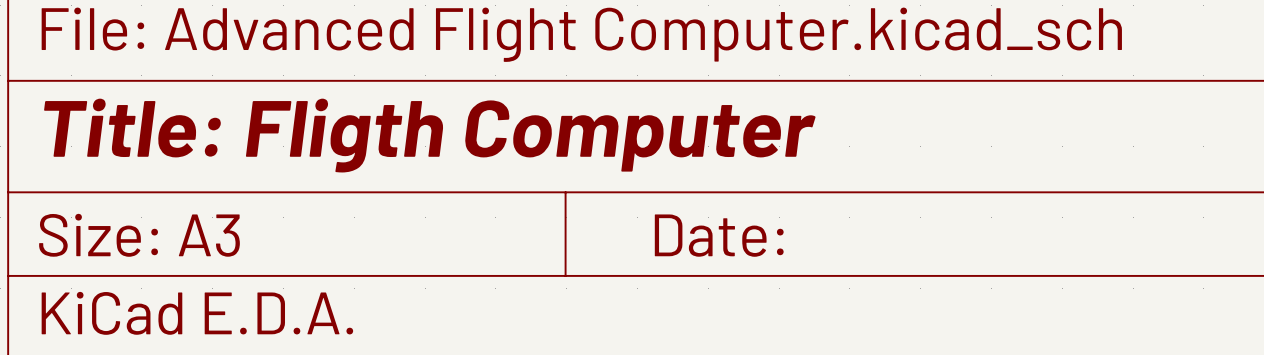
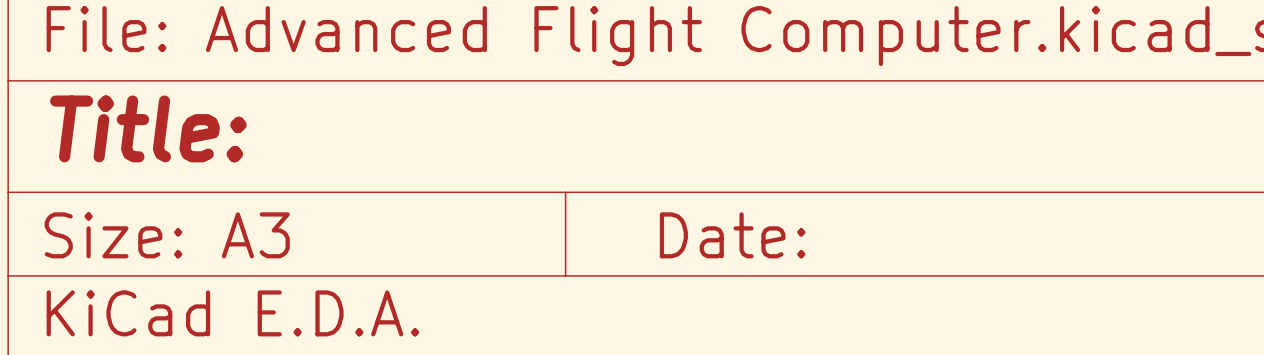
title block: Title: Fligth Computer (429, 135) -> Title: (148, 128)

